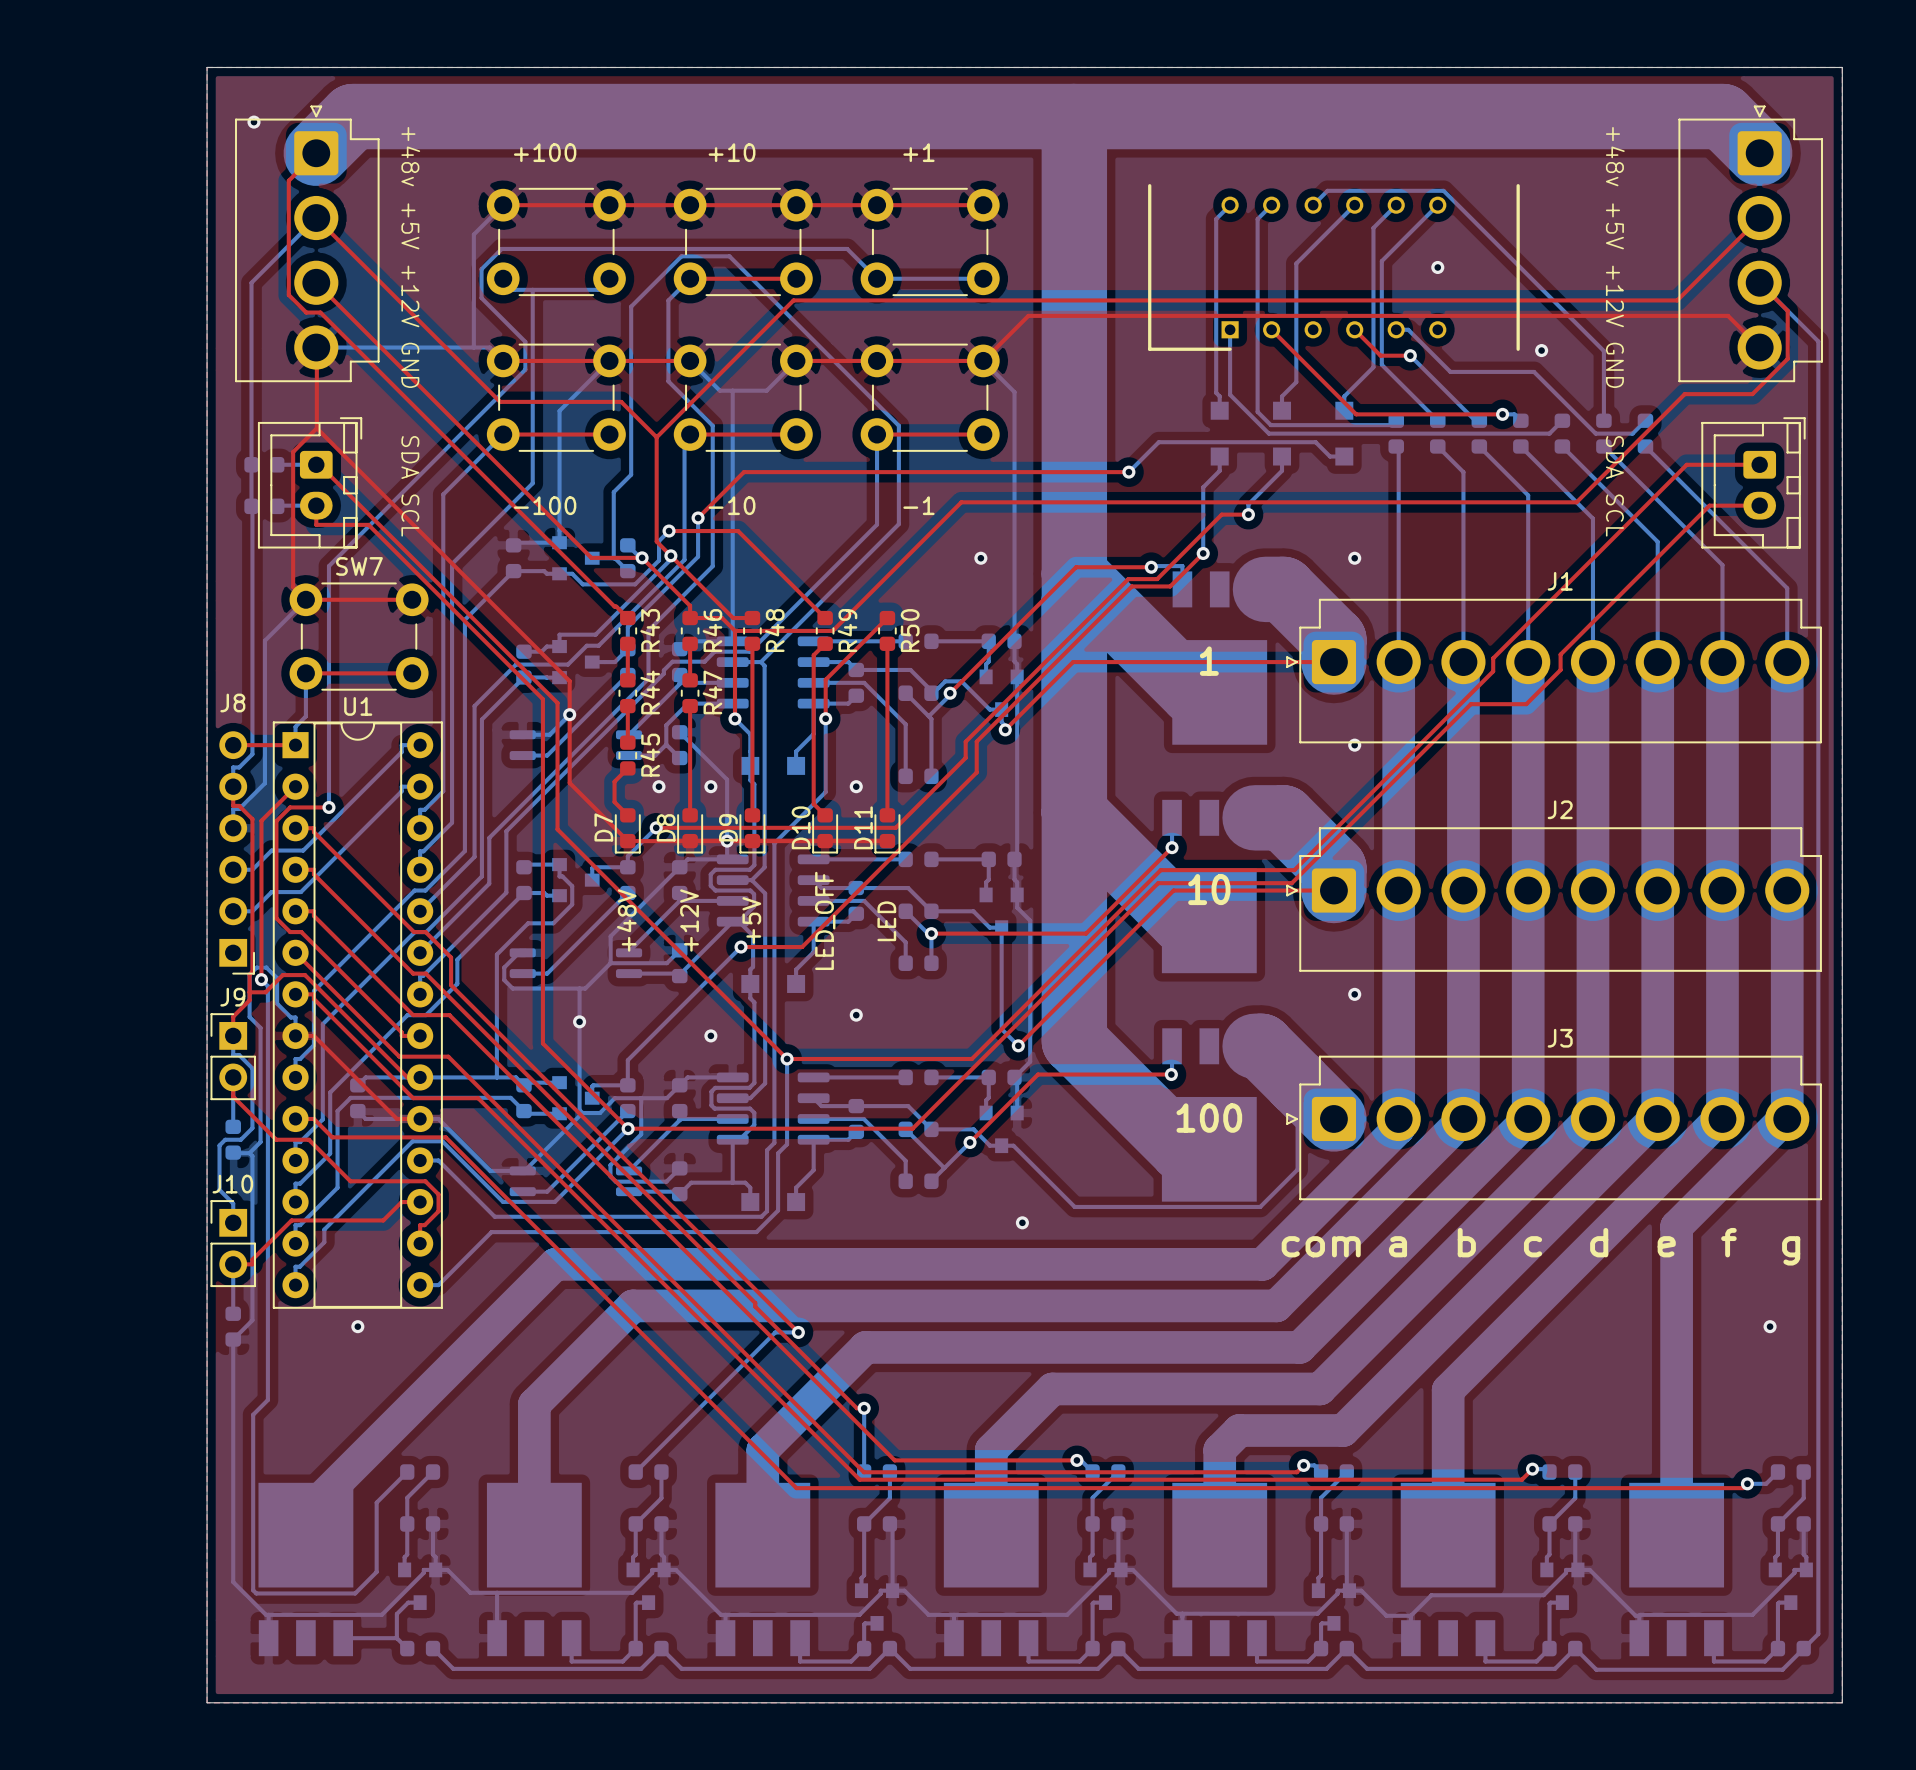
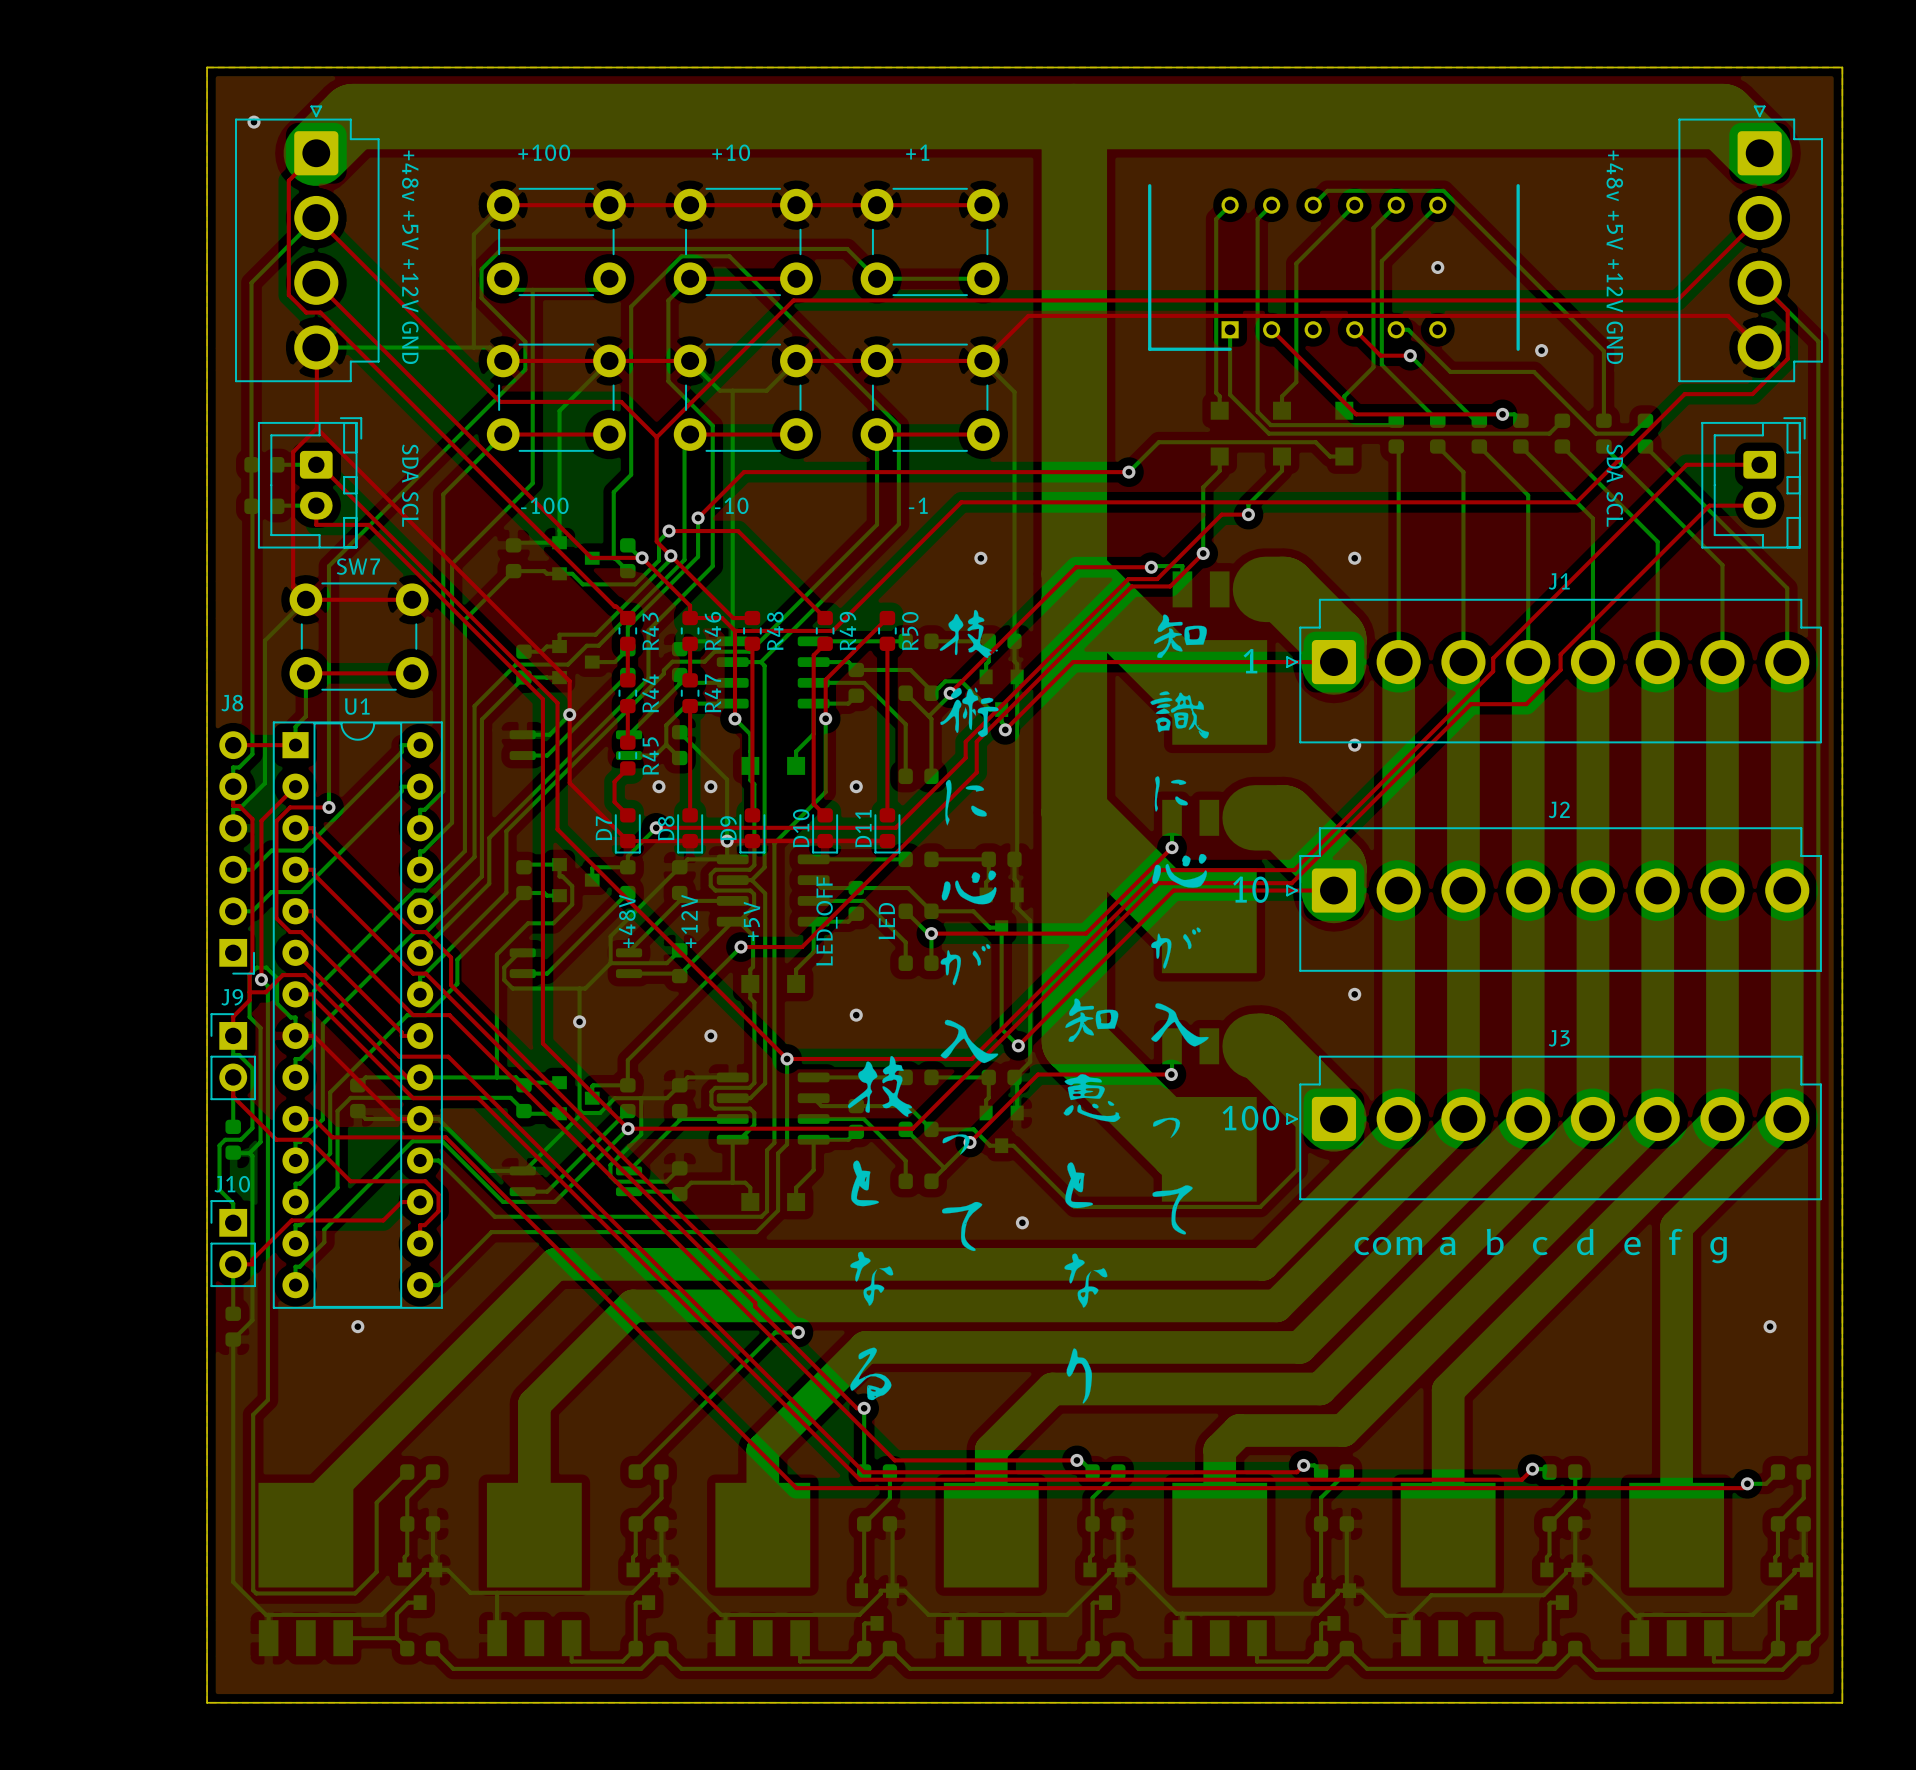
drawing: none -> [847, 609, 1209, 1404]
text position: 1 (1209, 661) -> 1 (1250, 661)
text position: 10 (1209, 889) -> 10 (1250, 889)
text position: 100 (1209, 1118) -> 100 (1250, 1118)

